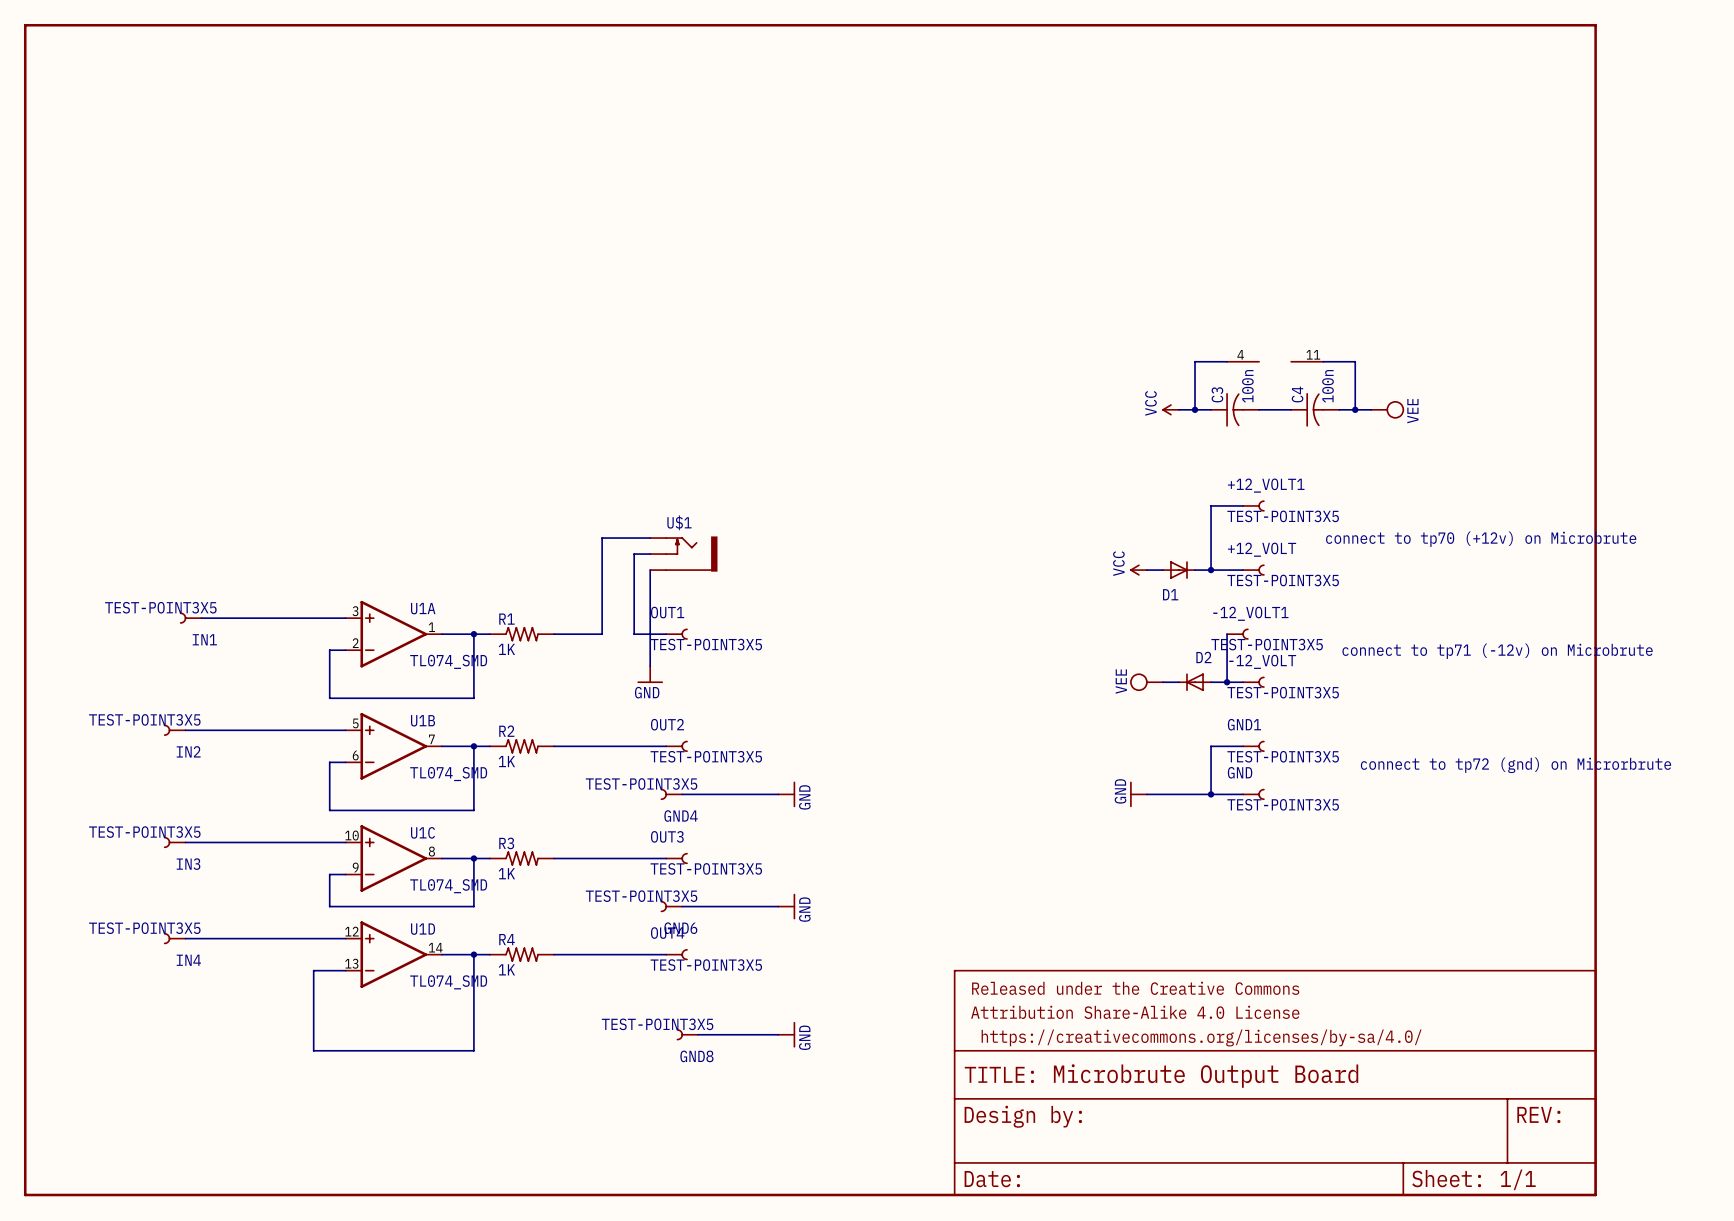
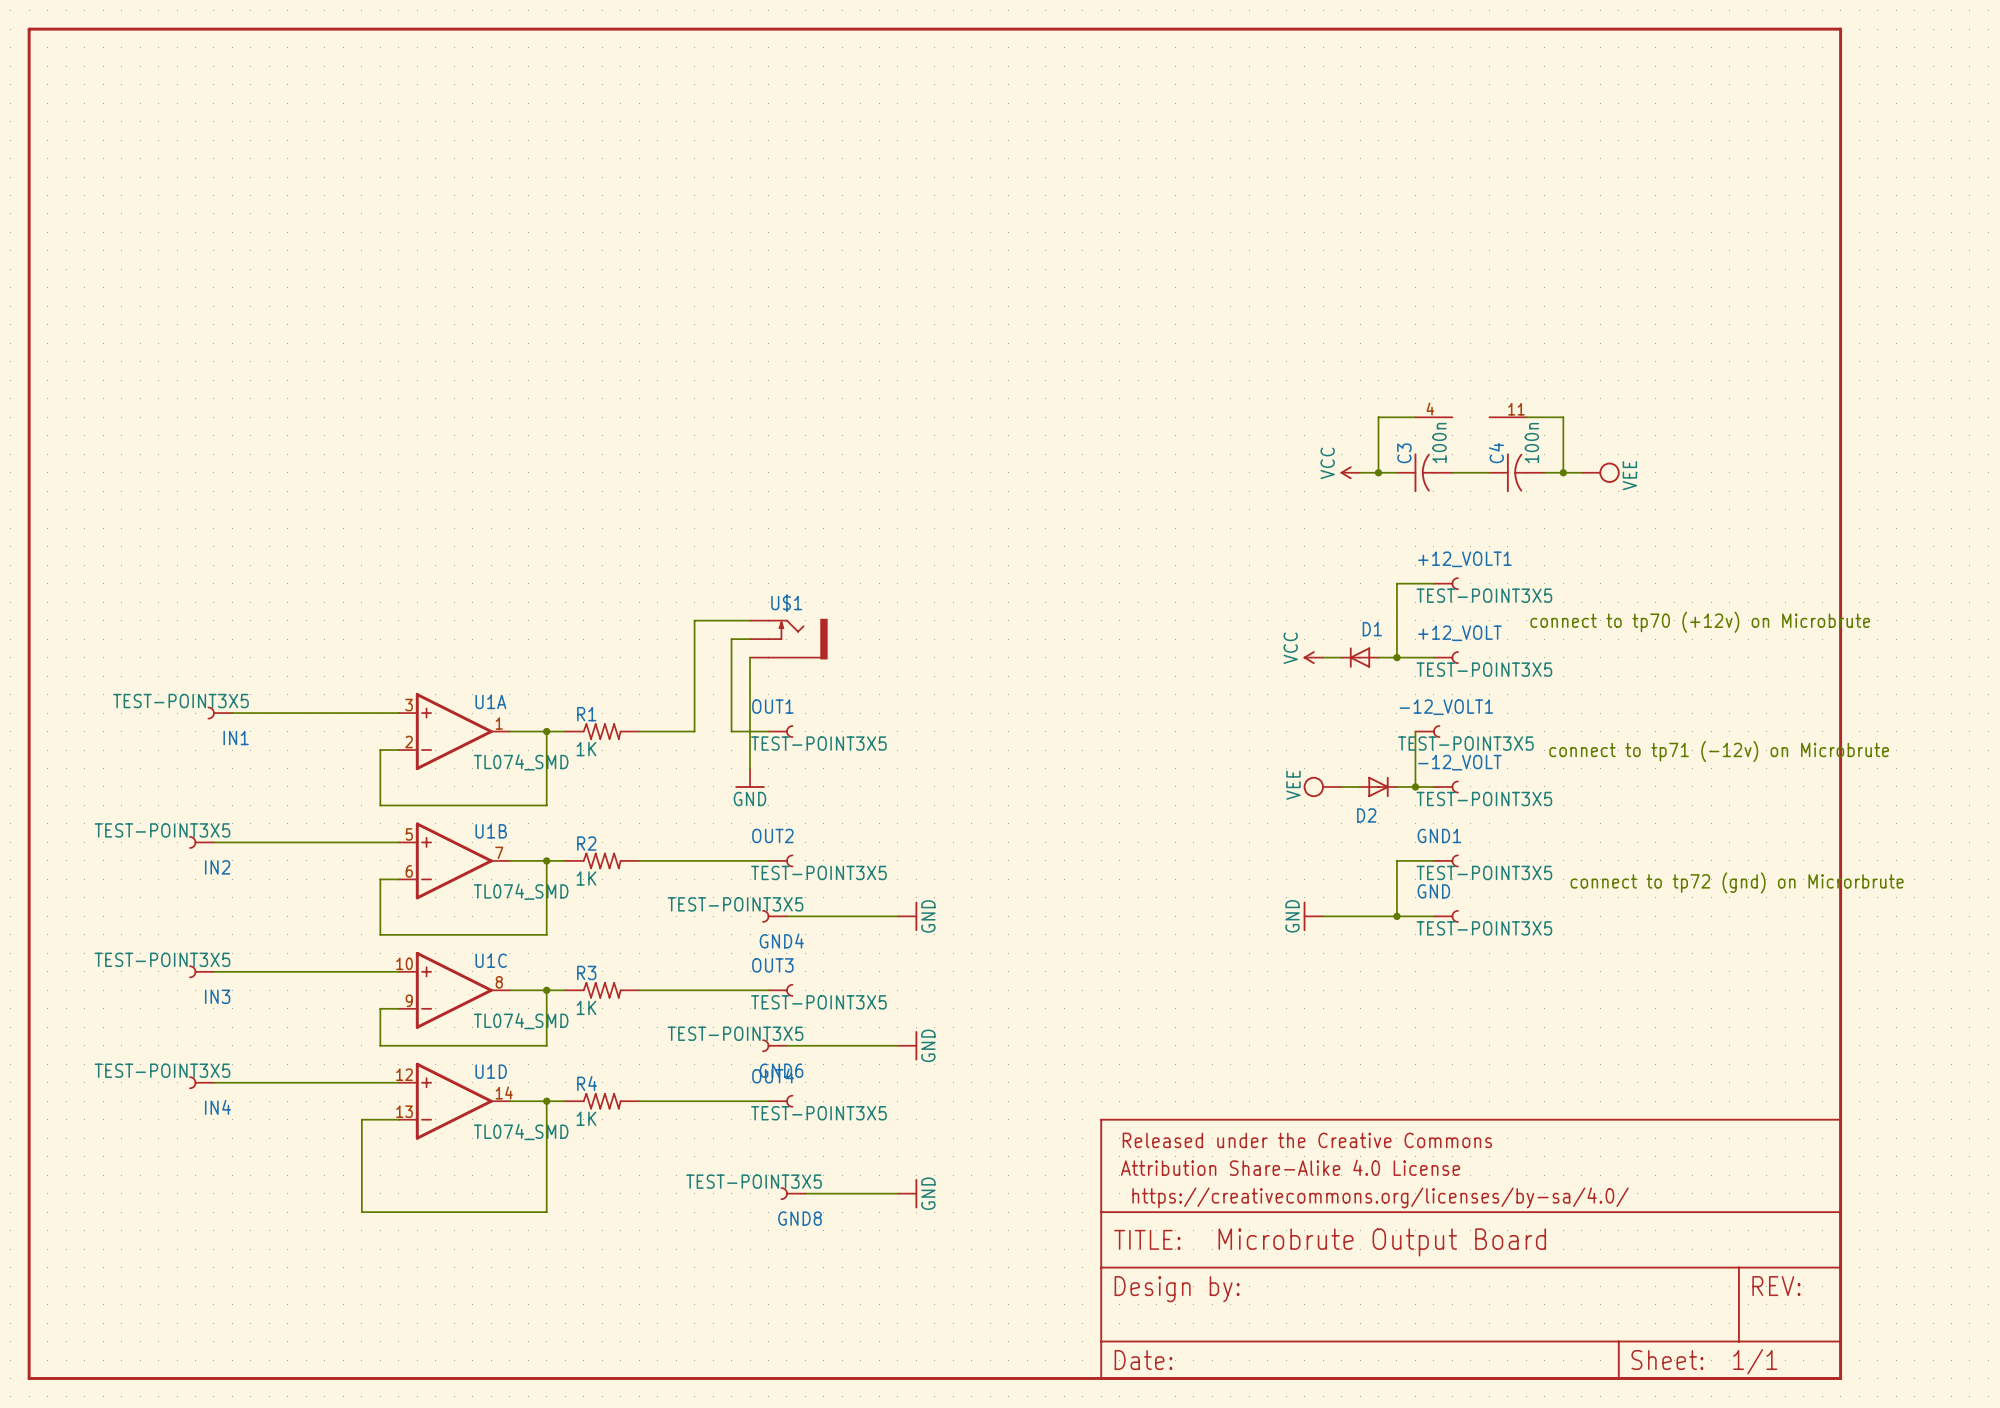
D1 rotation: 0° (1178, 570) -> 180° (1360, 657)
D2 rotation: 0° (1195, 682) -> 180° (1378, 786)

